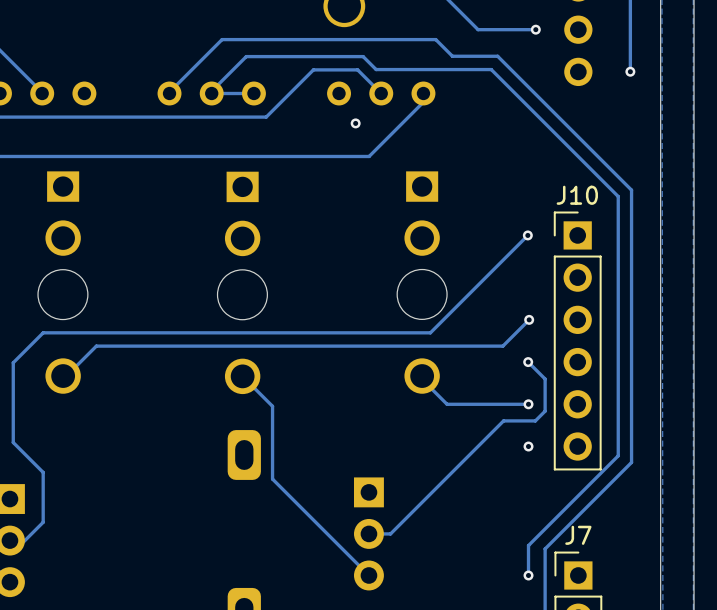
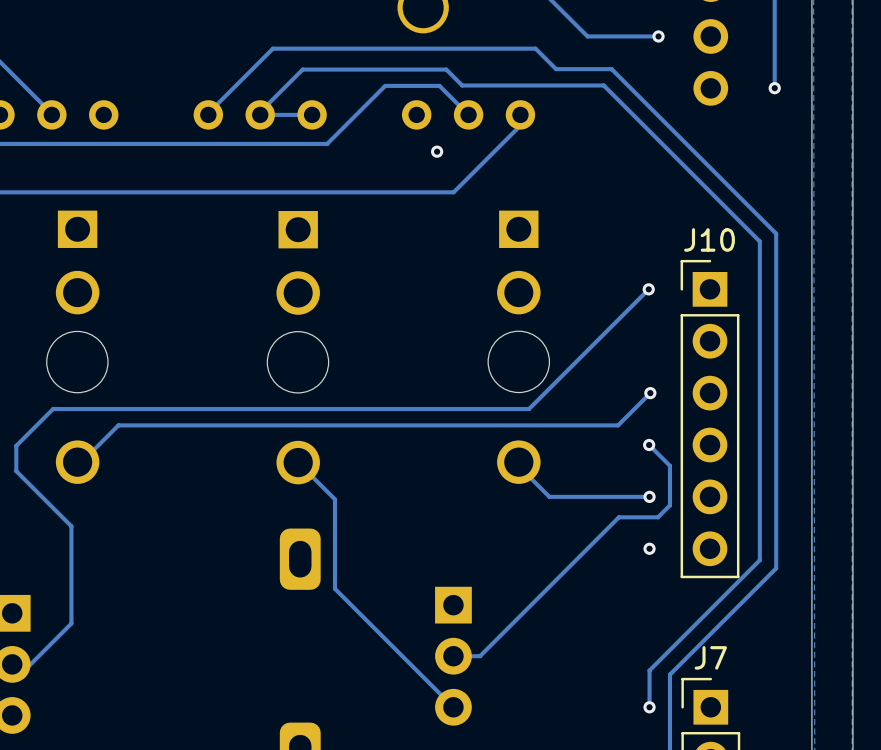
track: (13, 383) (13, 442) (43, 472) (43, 522) -> (16, 471) (71, 526) (71, 623) (53, 641)

